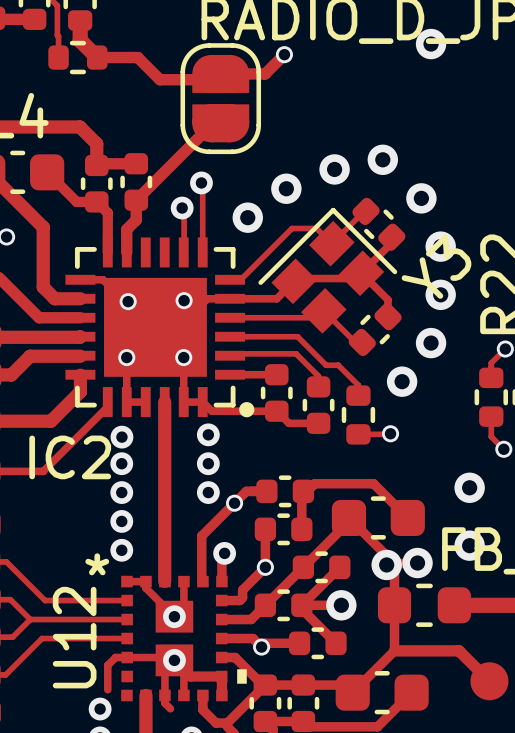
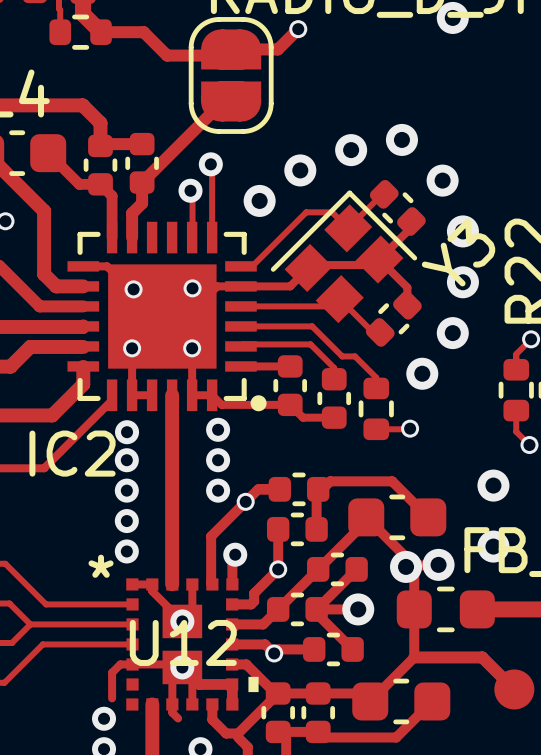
U12 name rotation: 0° (74, 637) -> 90° clockwise (183, 642)

